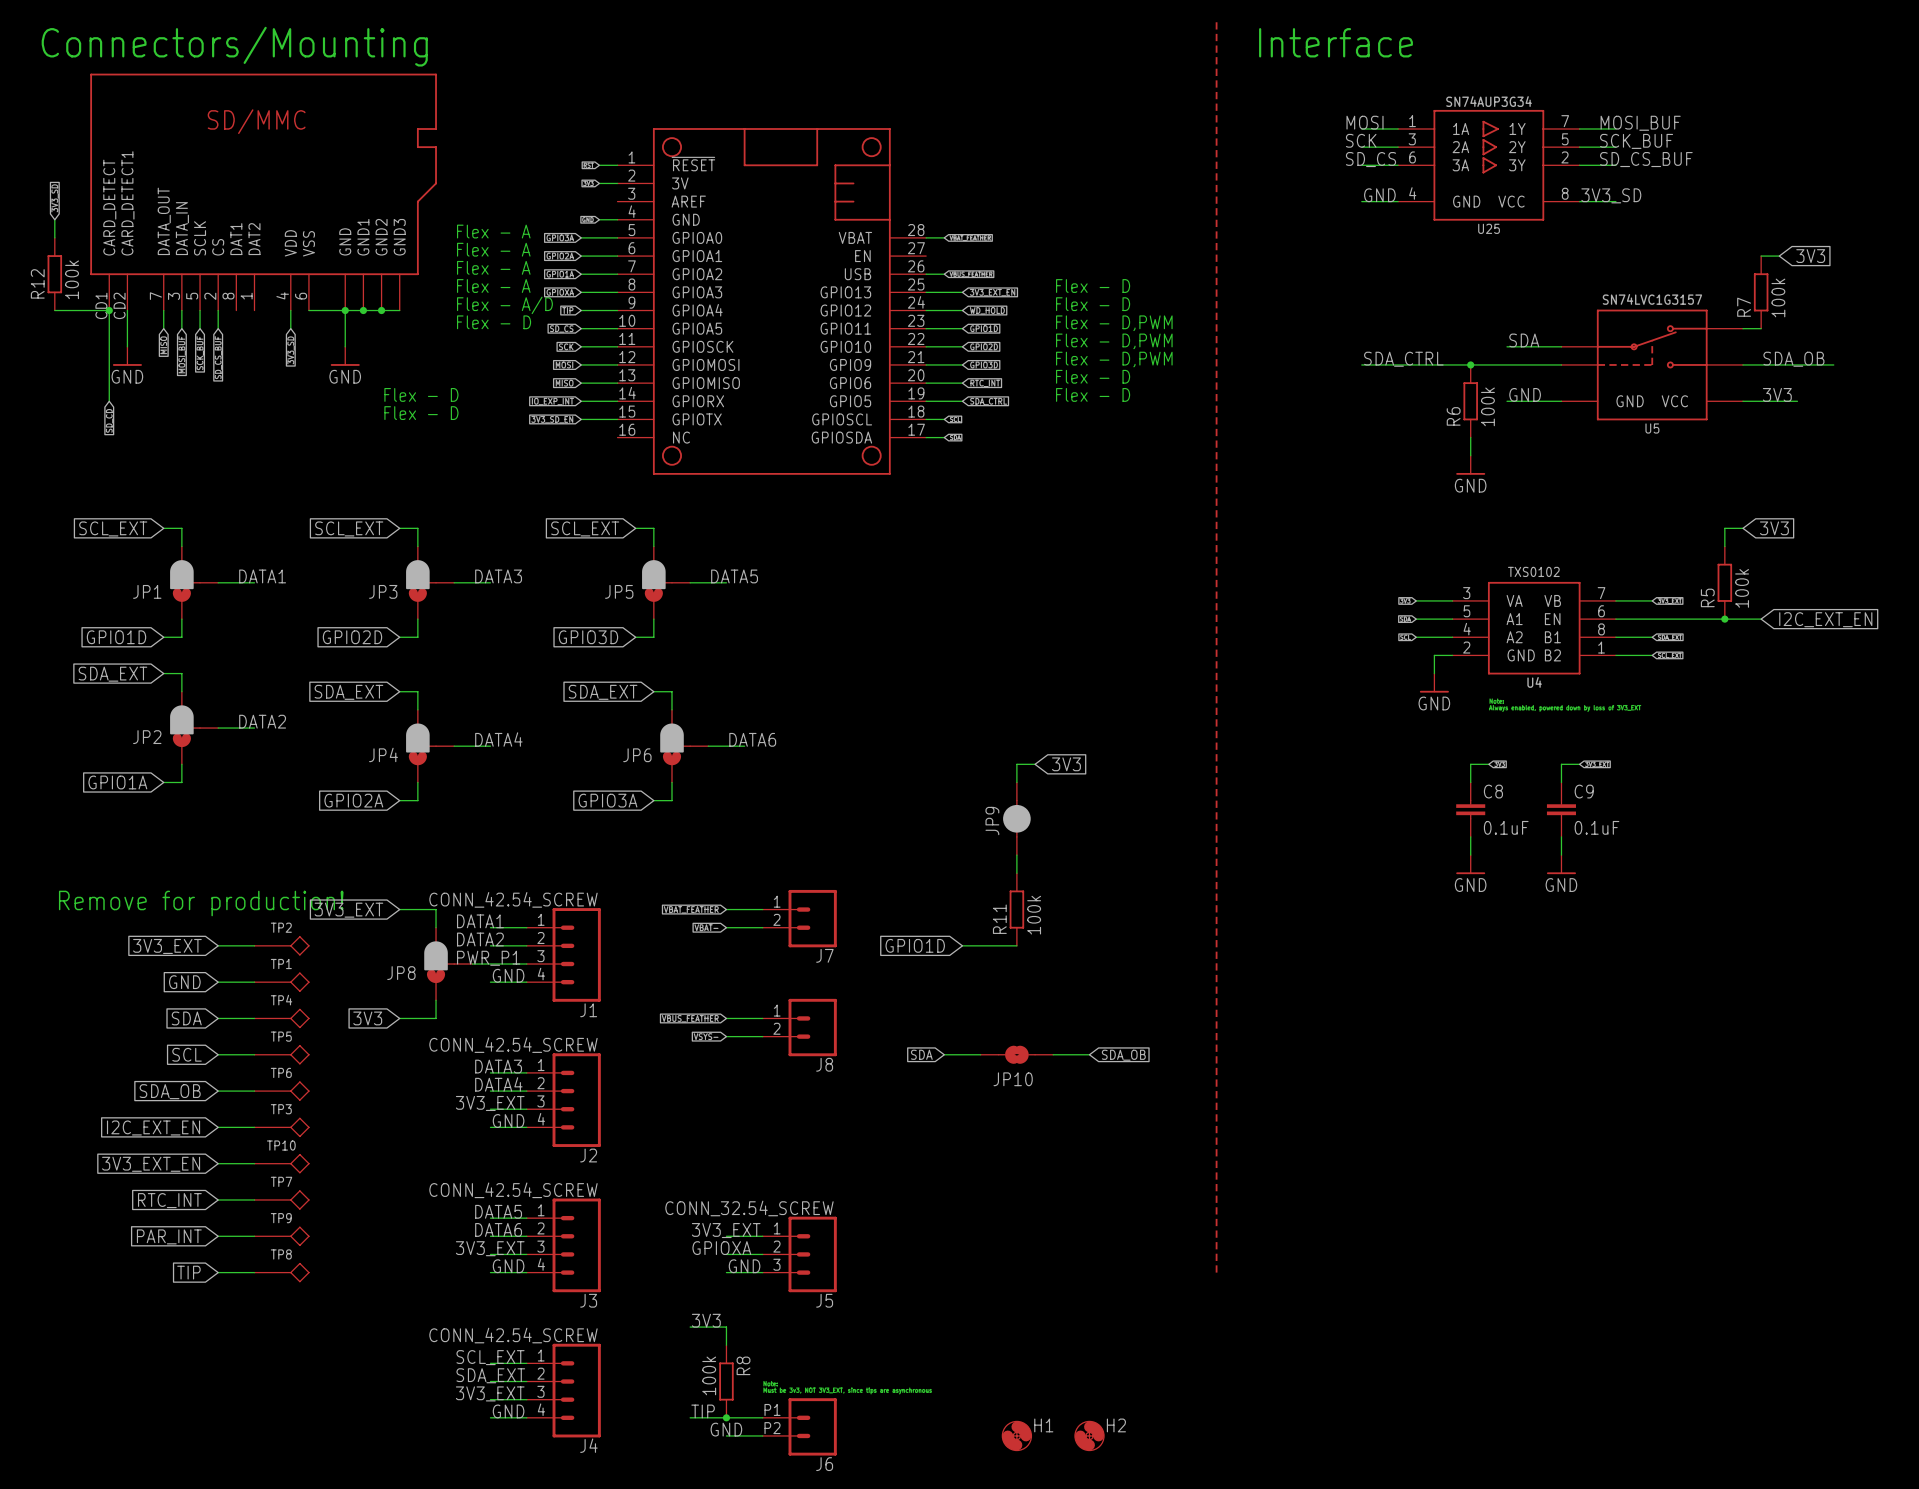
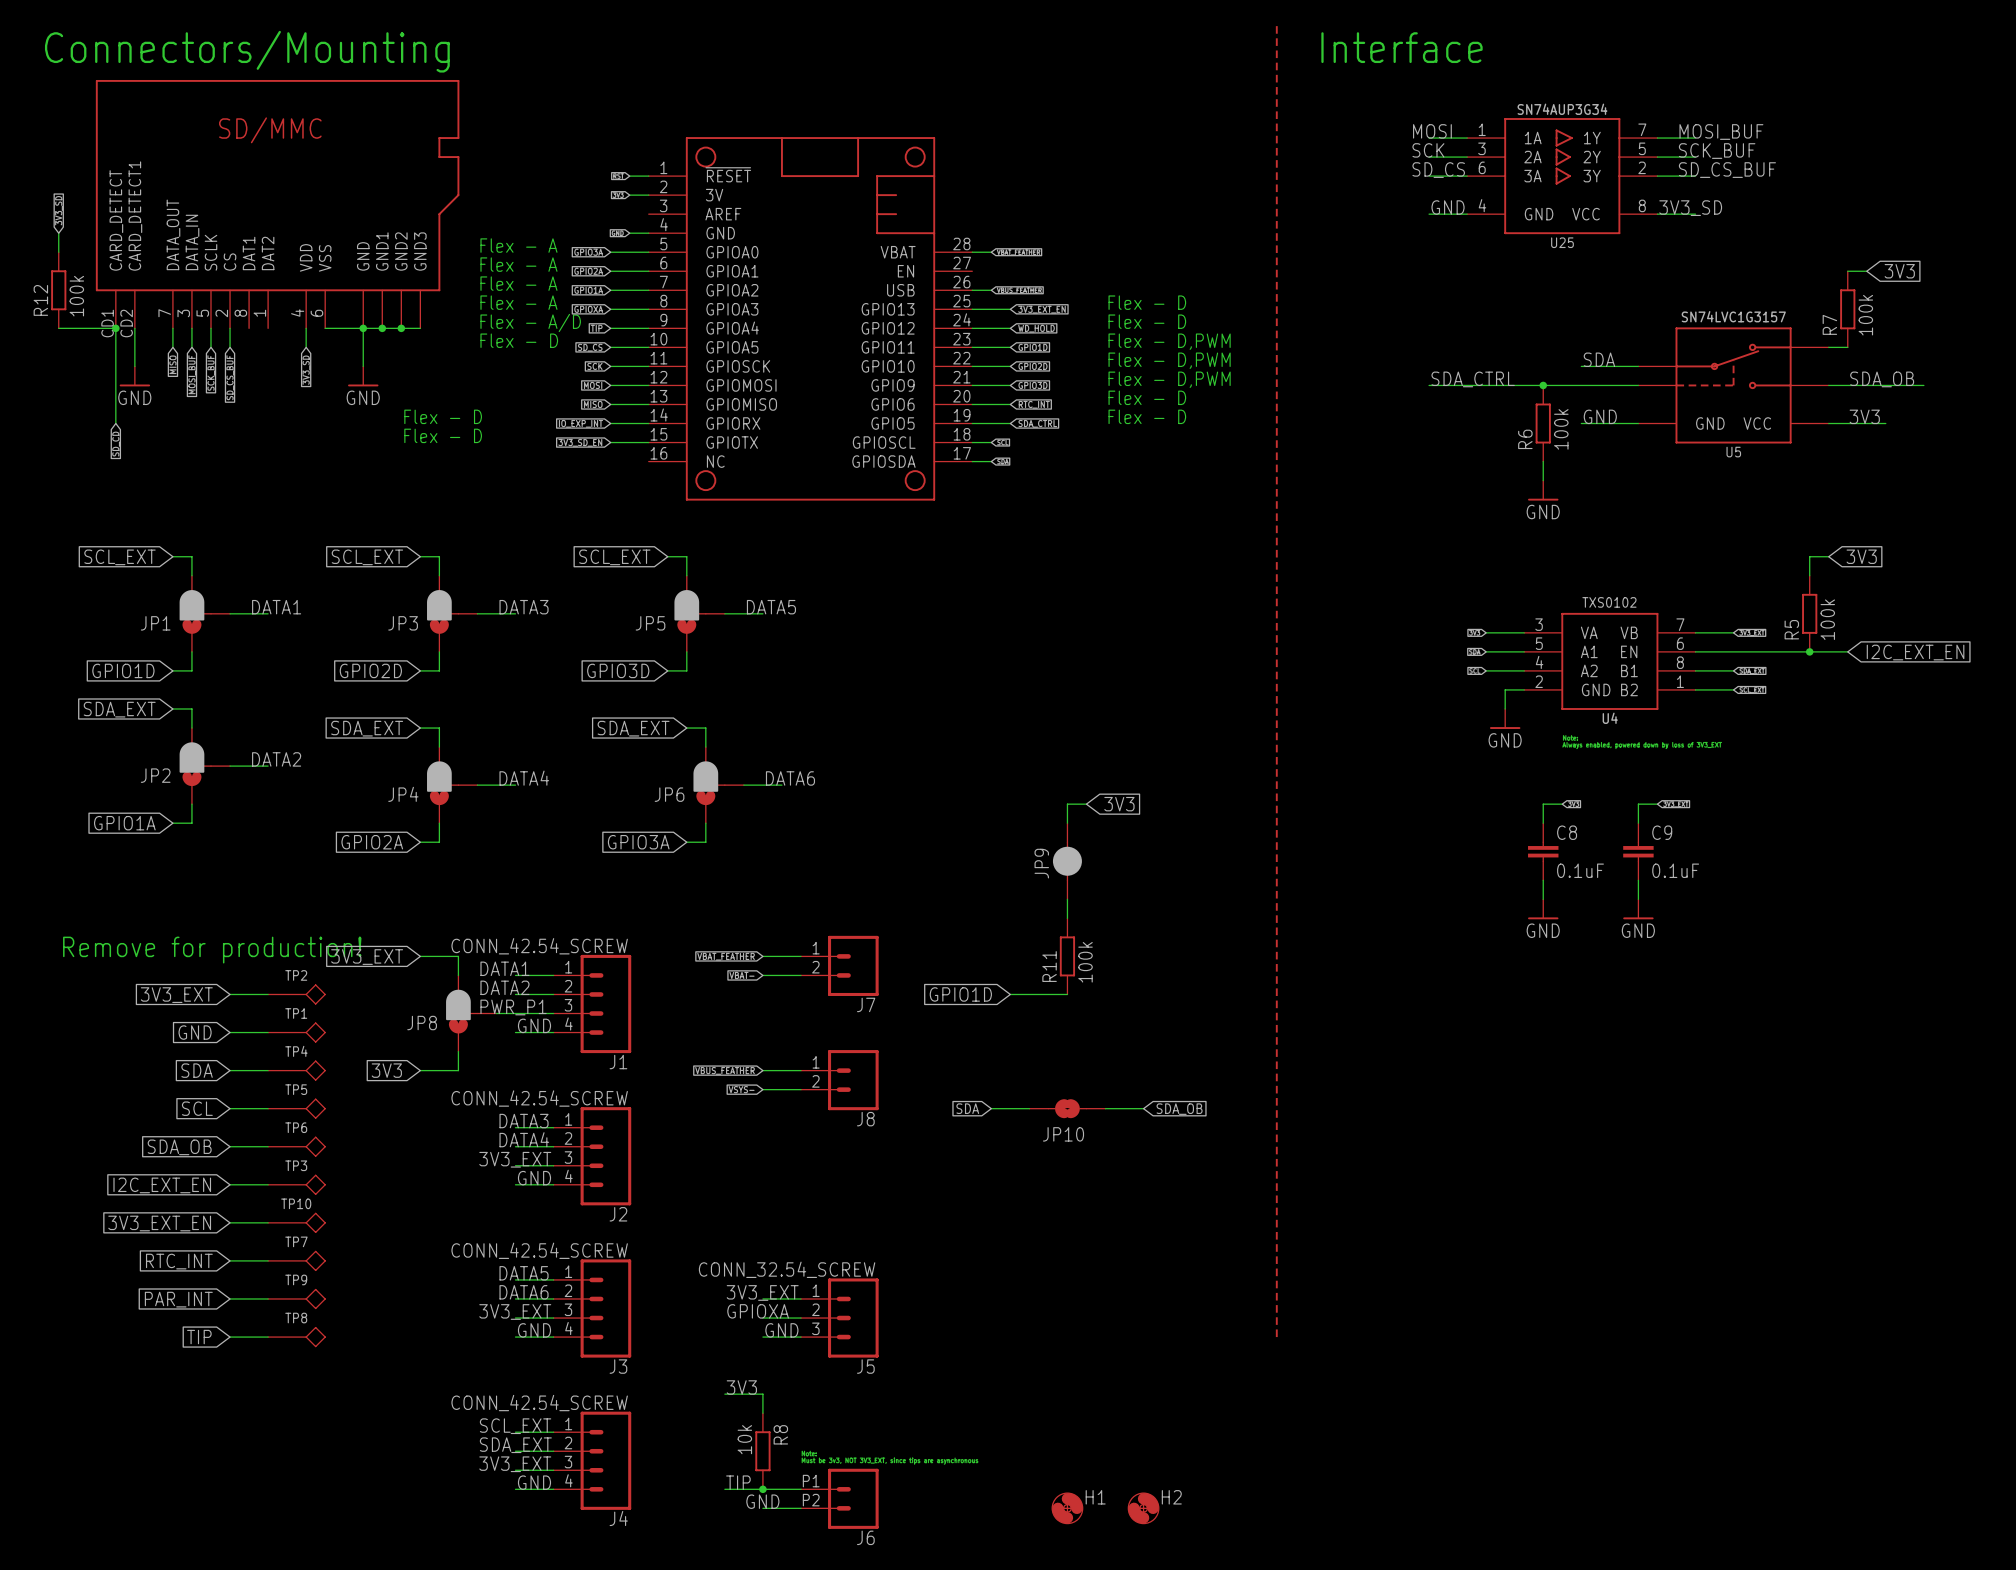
R8 value: 100k (709, 1375) -> 10k (744, 1439)

